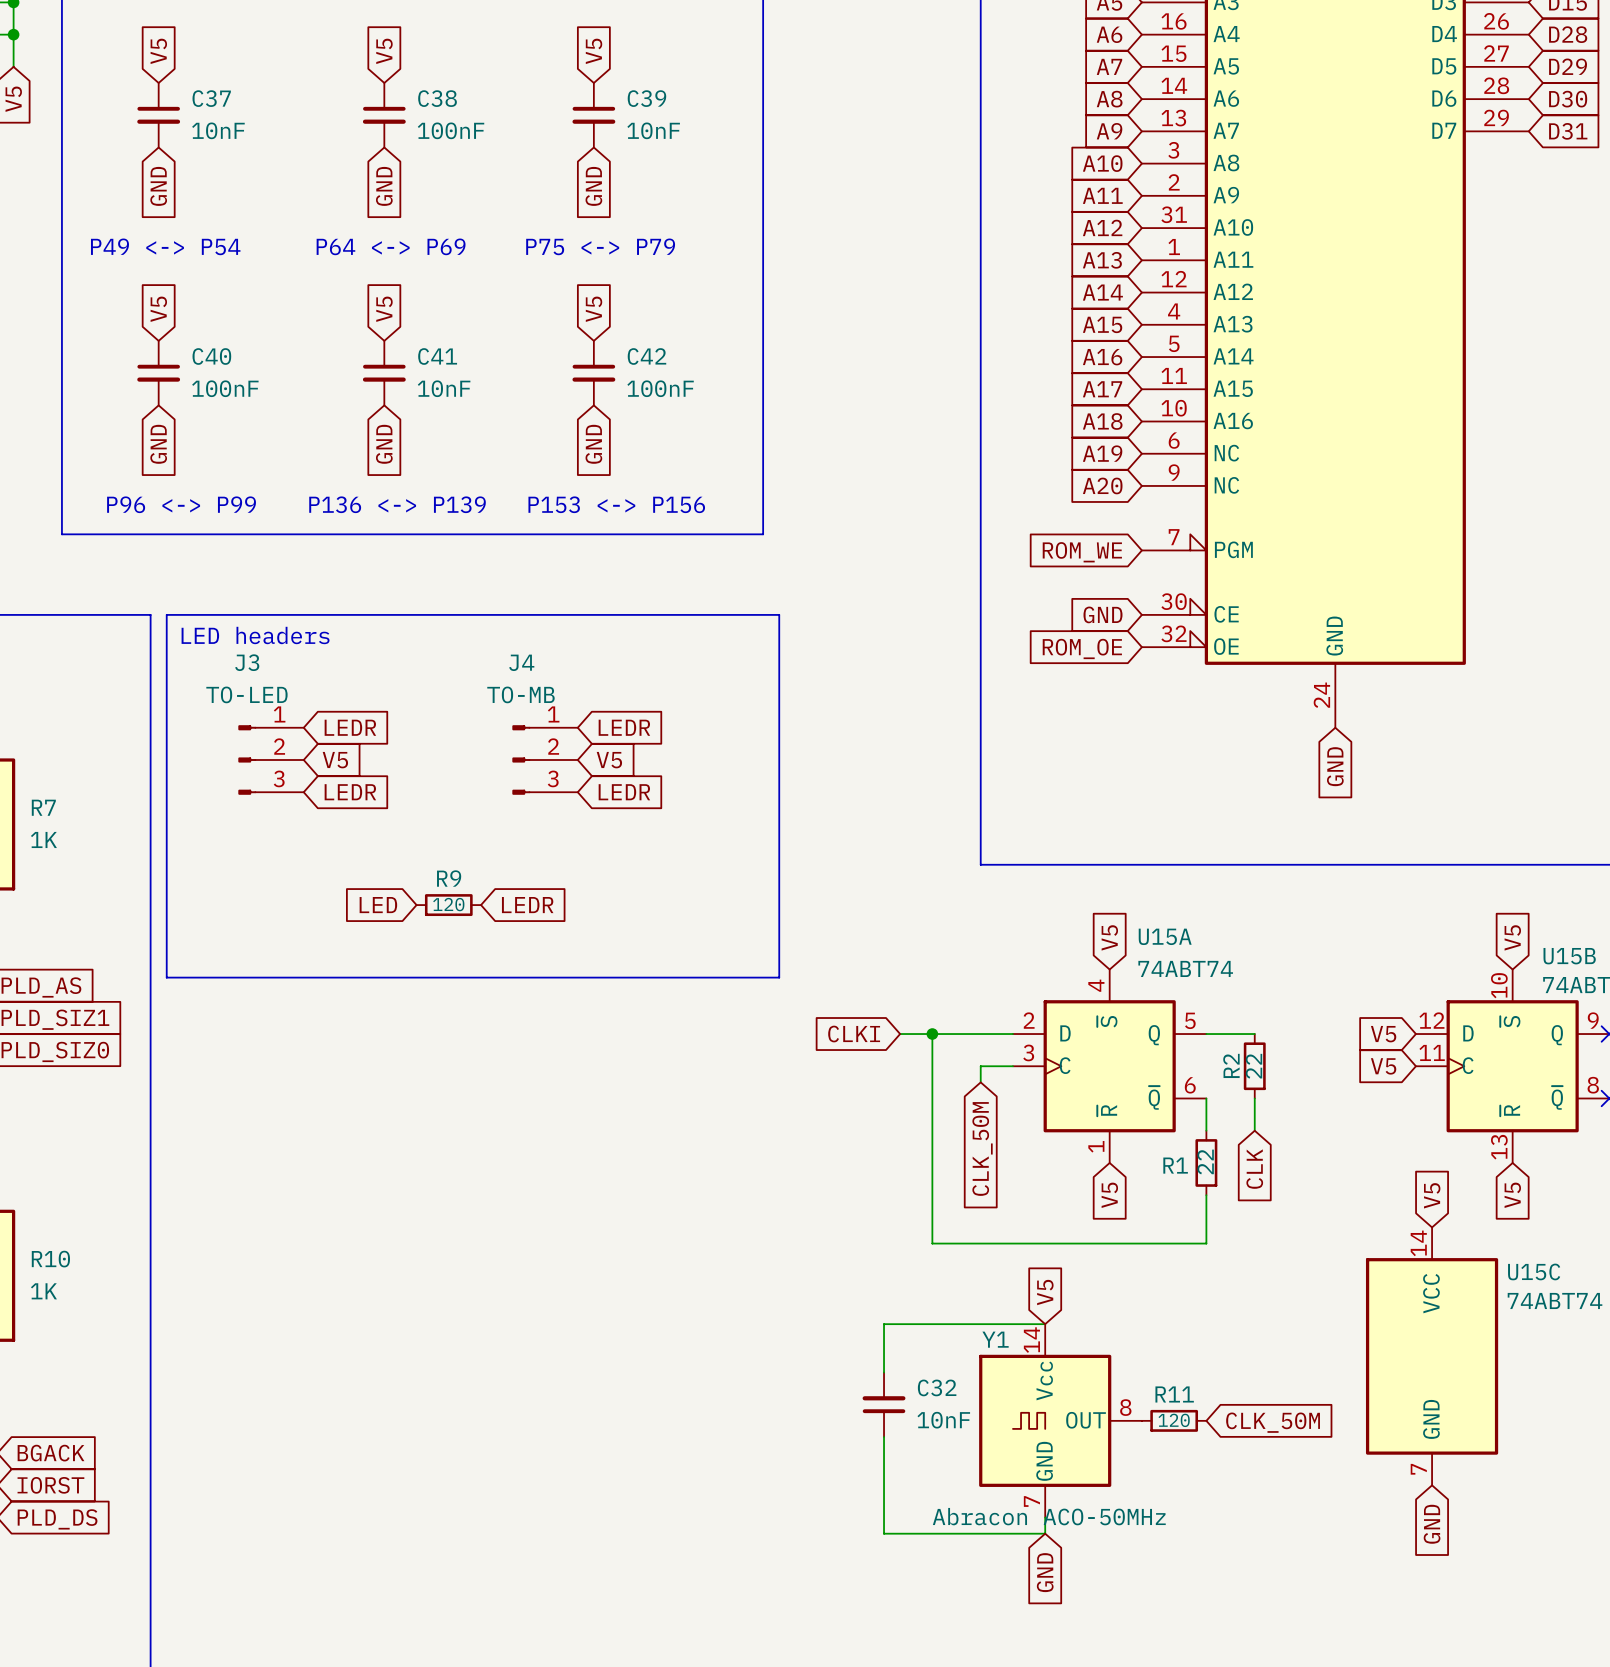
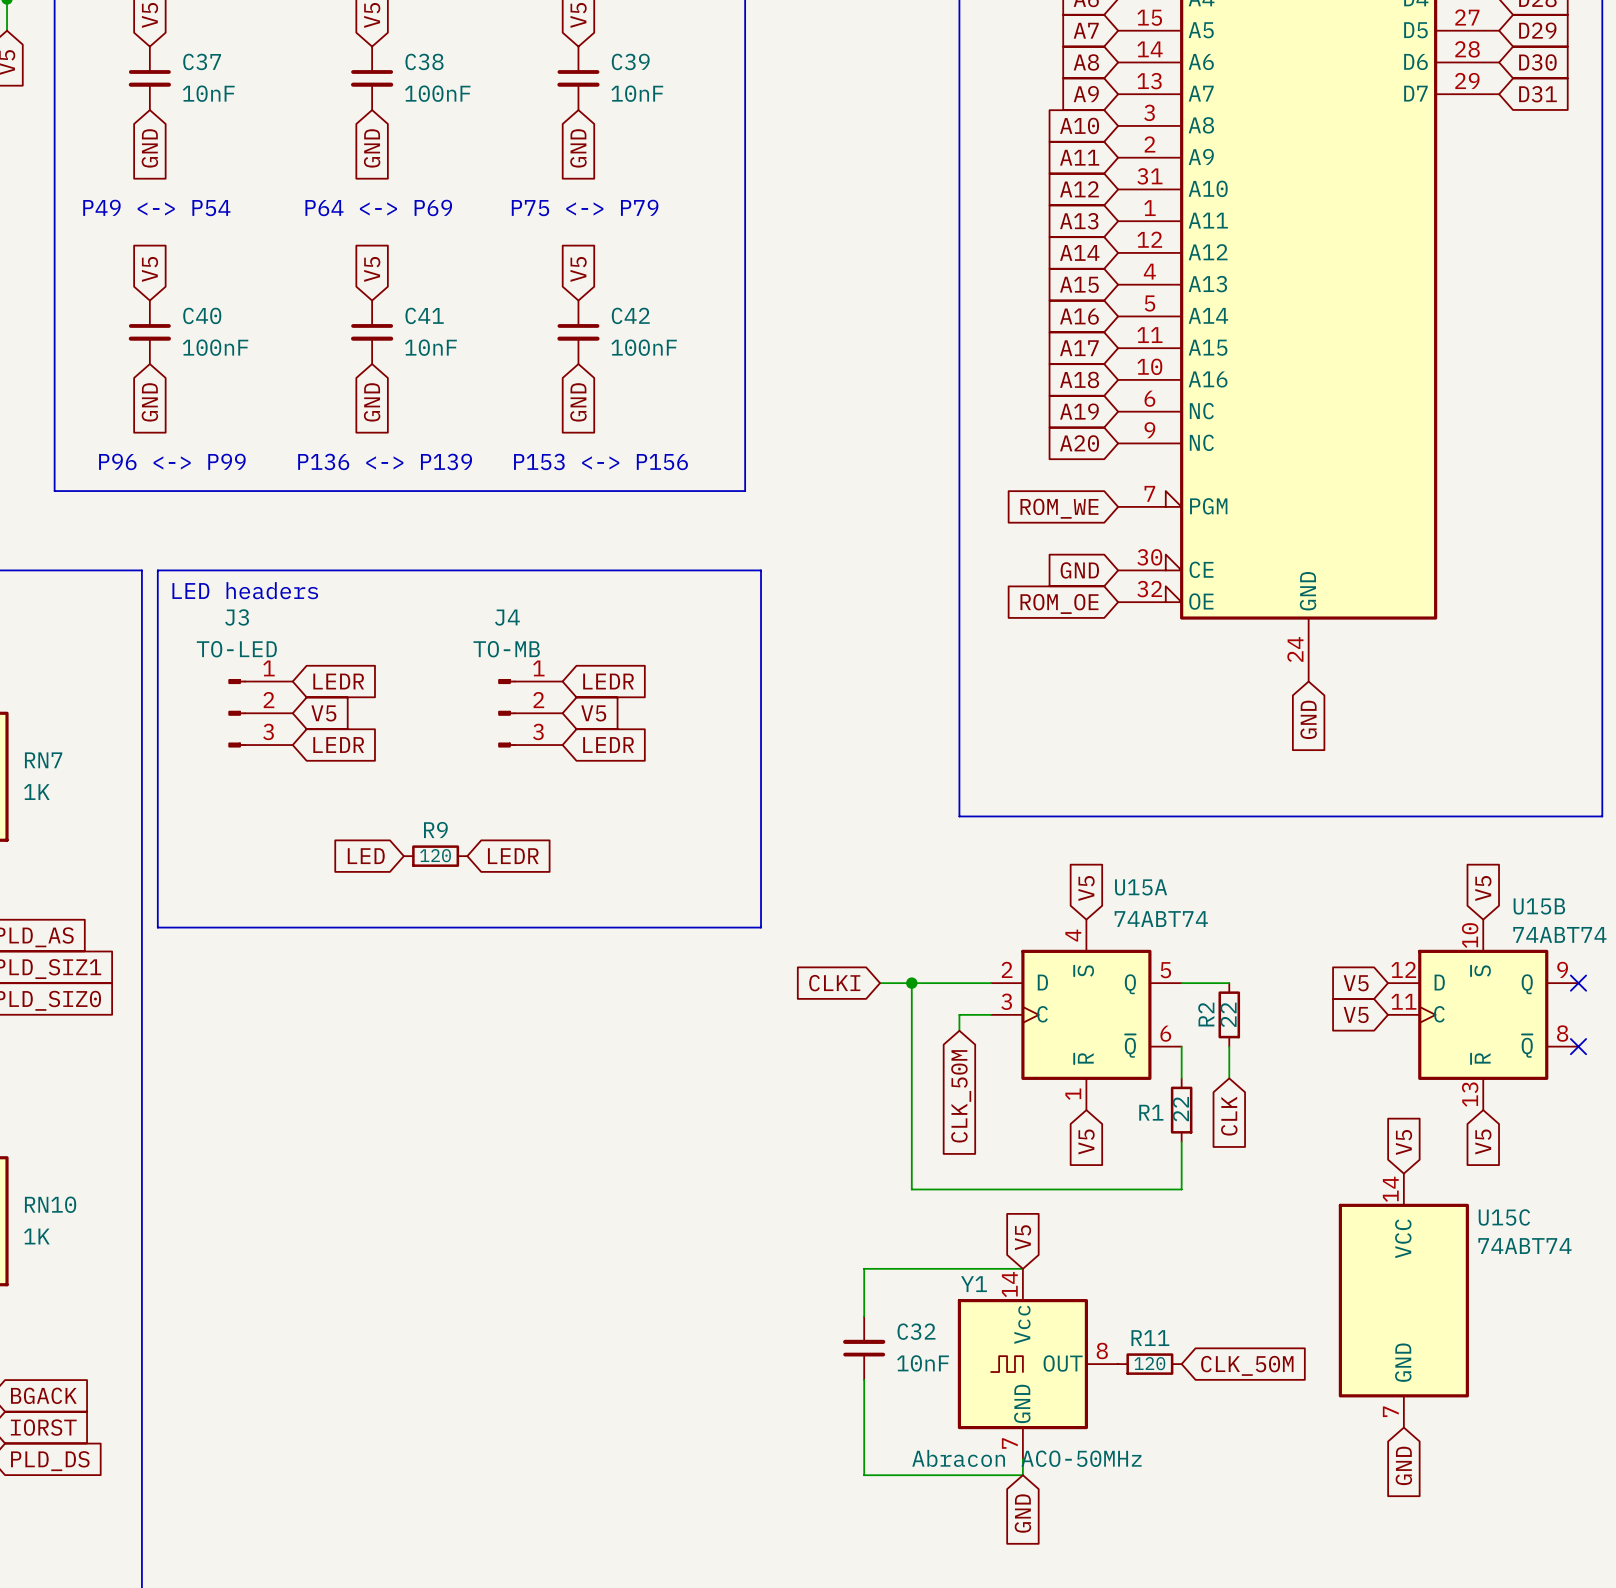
R7 name: R7 (43, 807) -> RN7 (43, 760)
R10 name: R10 (50, 1259) -> RN10 (50, 1204)

